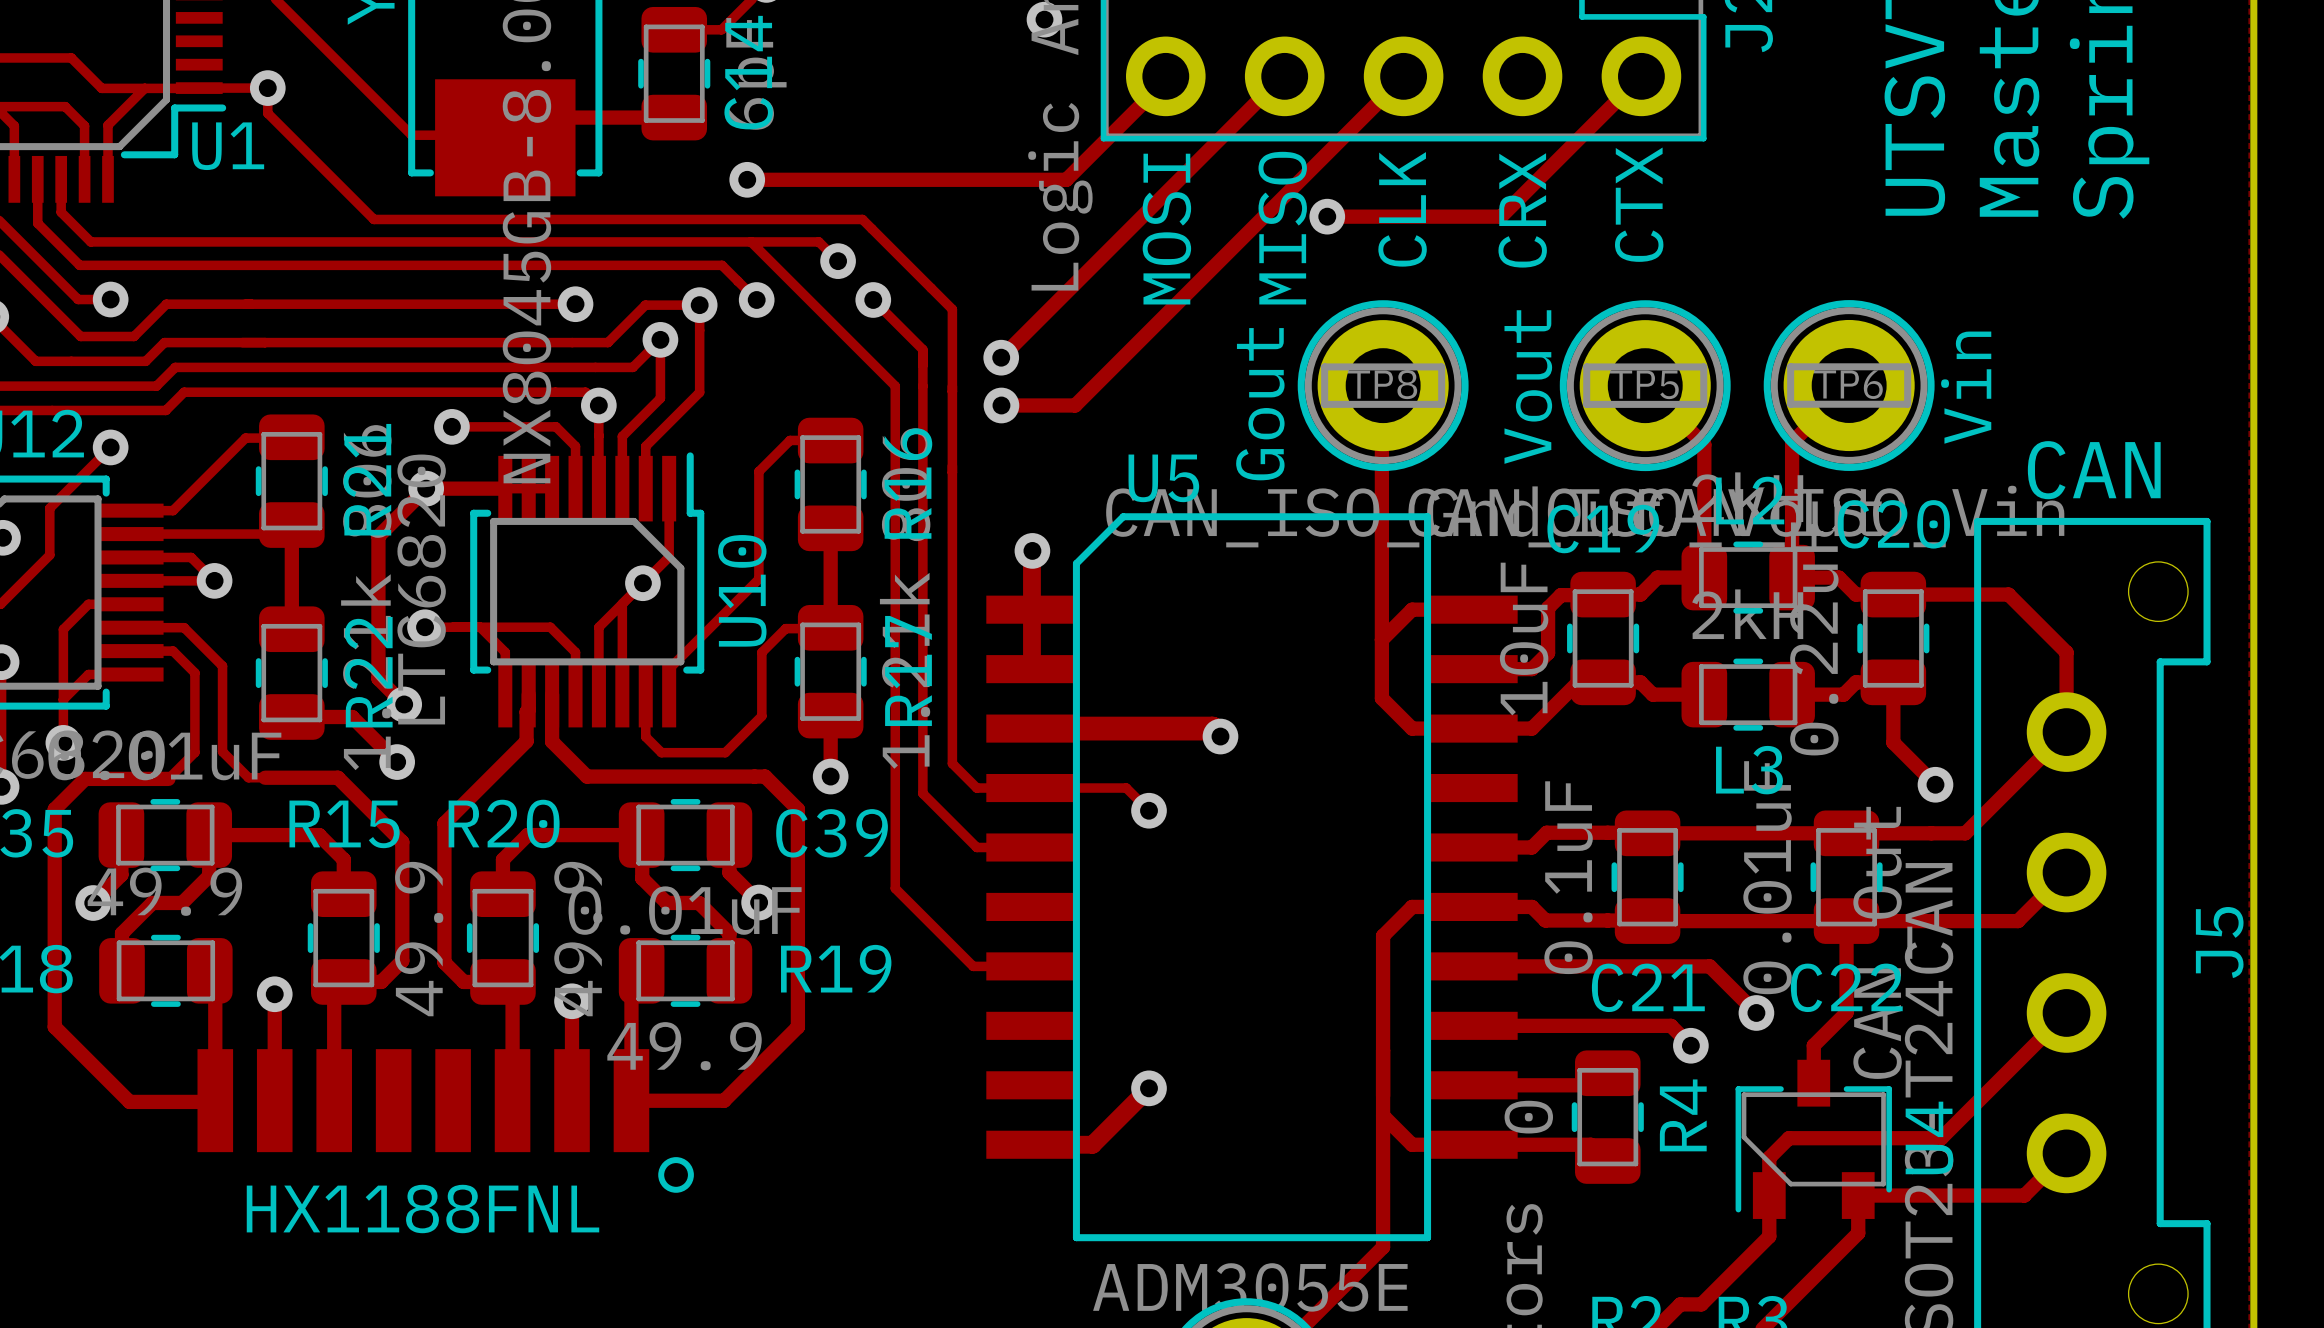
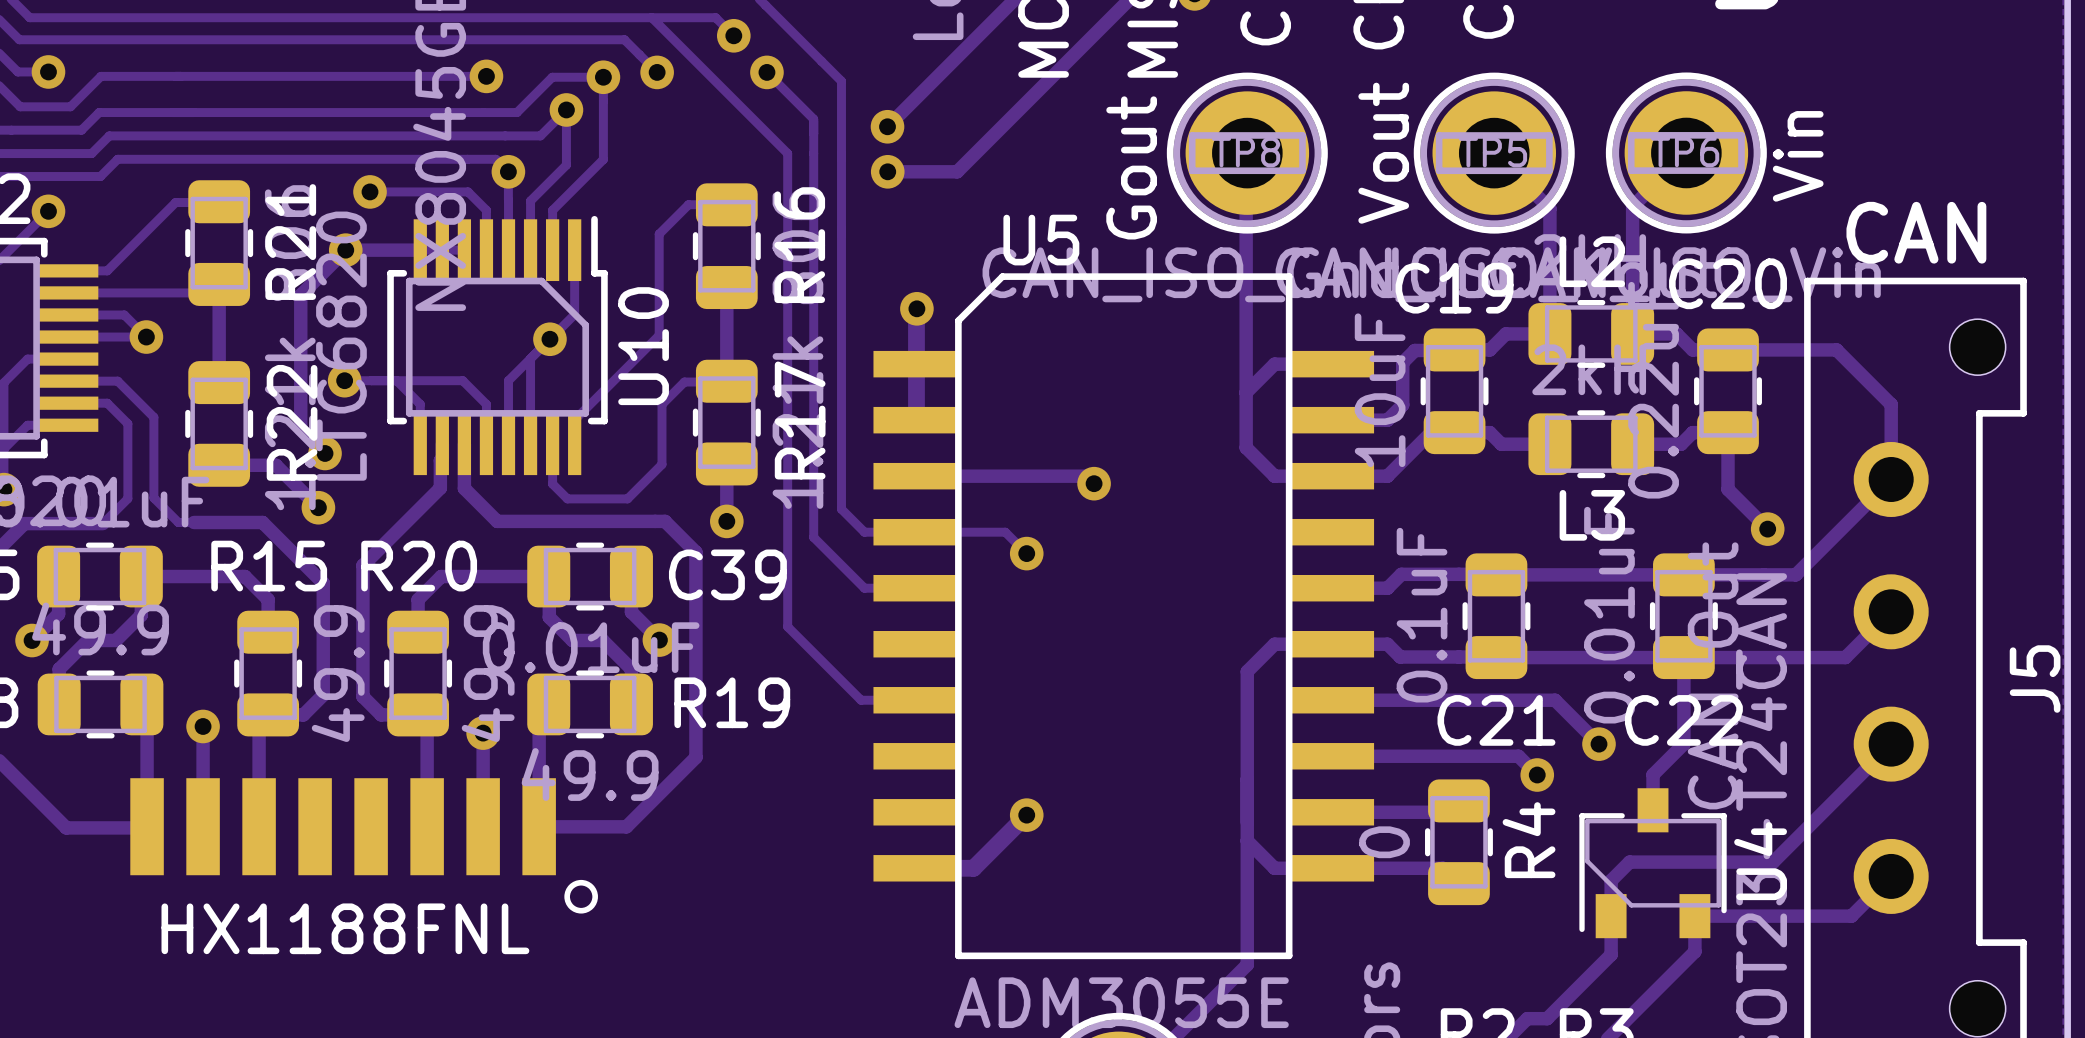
track width: thick (1031, 728) (1212, 728) (1220, 736) -> thin (916, 476) (1086, 476) (1094, 483)

